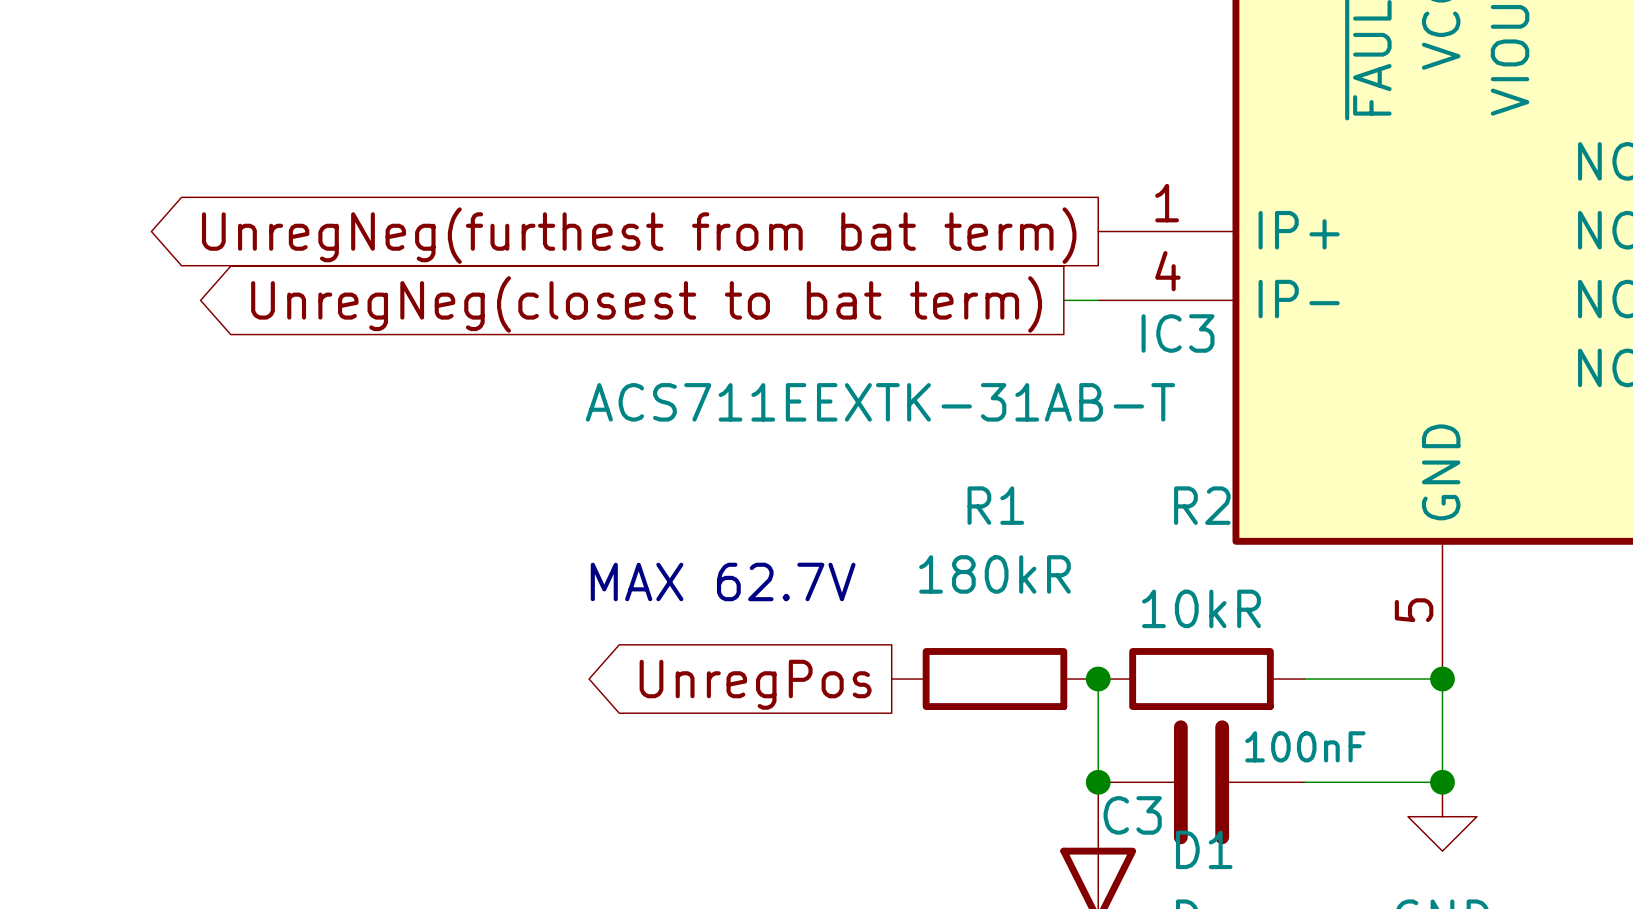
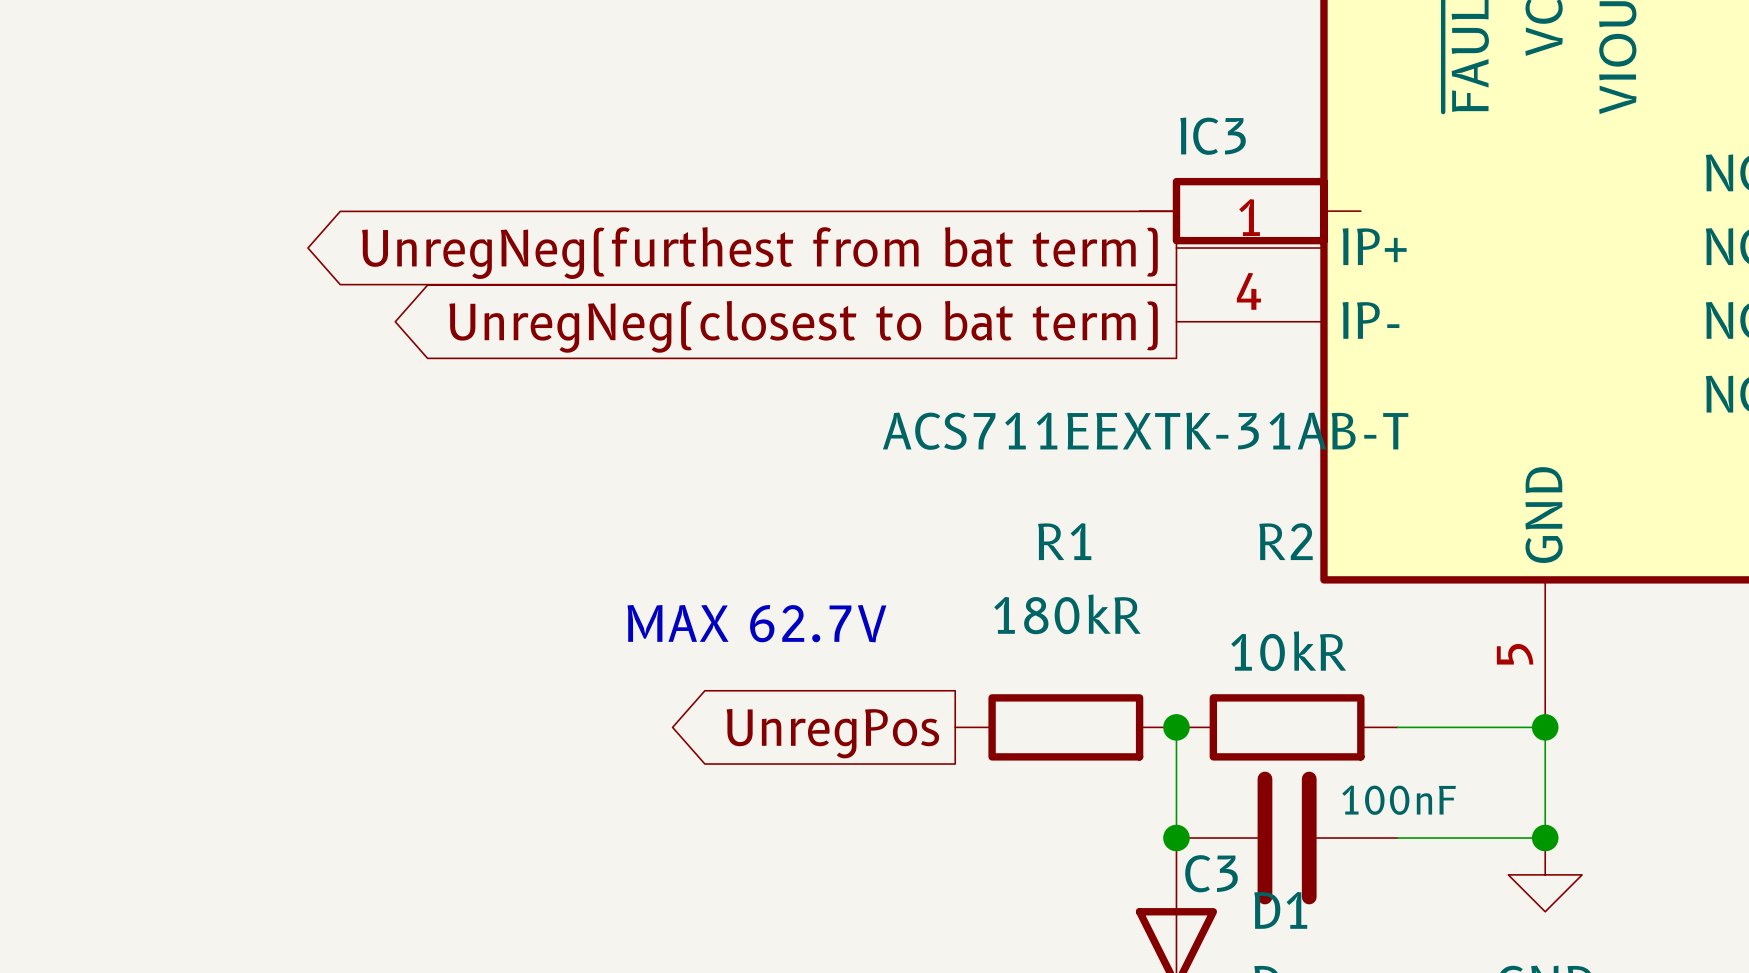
part: none -> (1250, 211)
wire: (1063, 300) (1098, 300) -> none
global label position: UnregNeg(closest to bat term) (646, 304) -> UnregNeg(closest to bat term) (803, 326)
IC3 name position: IC3 (1178, 333) -> IC3 (1213, 136)
IC3 value position: ACS711EEXTK-31AB-T (880, 402) -> ACS711EEXTK-31AB-T (1145, 431)

